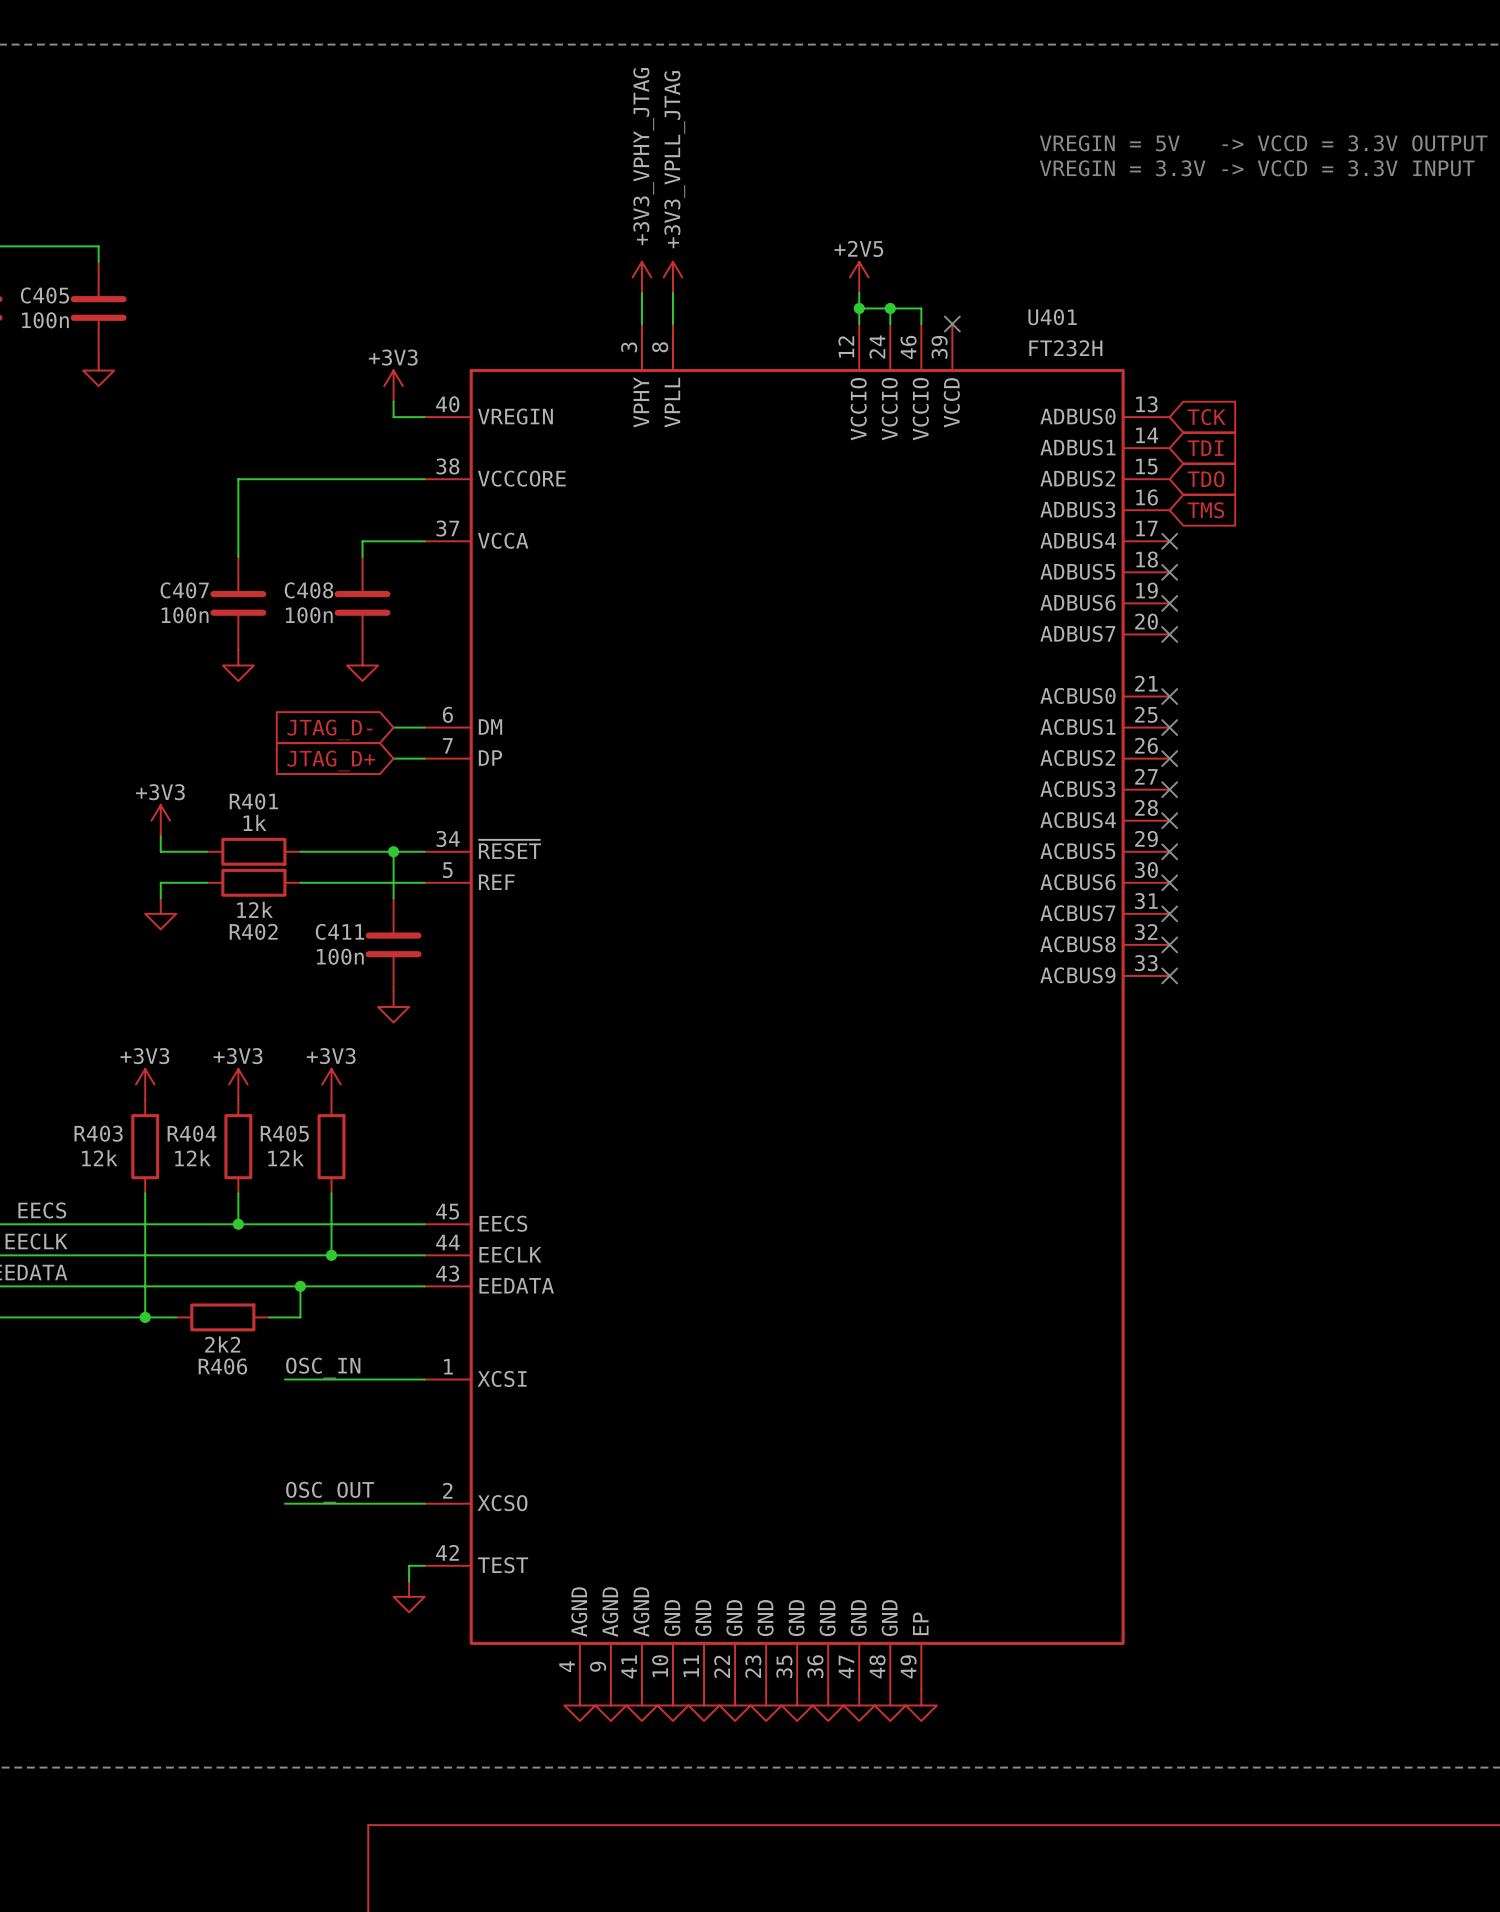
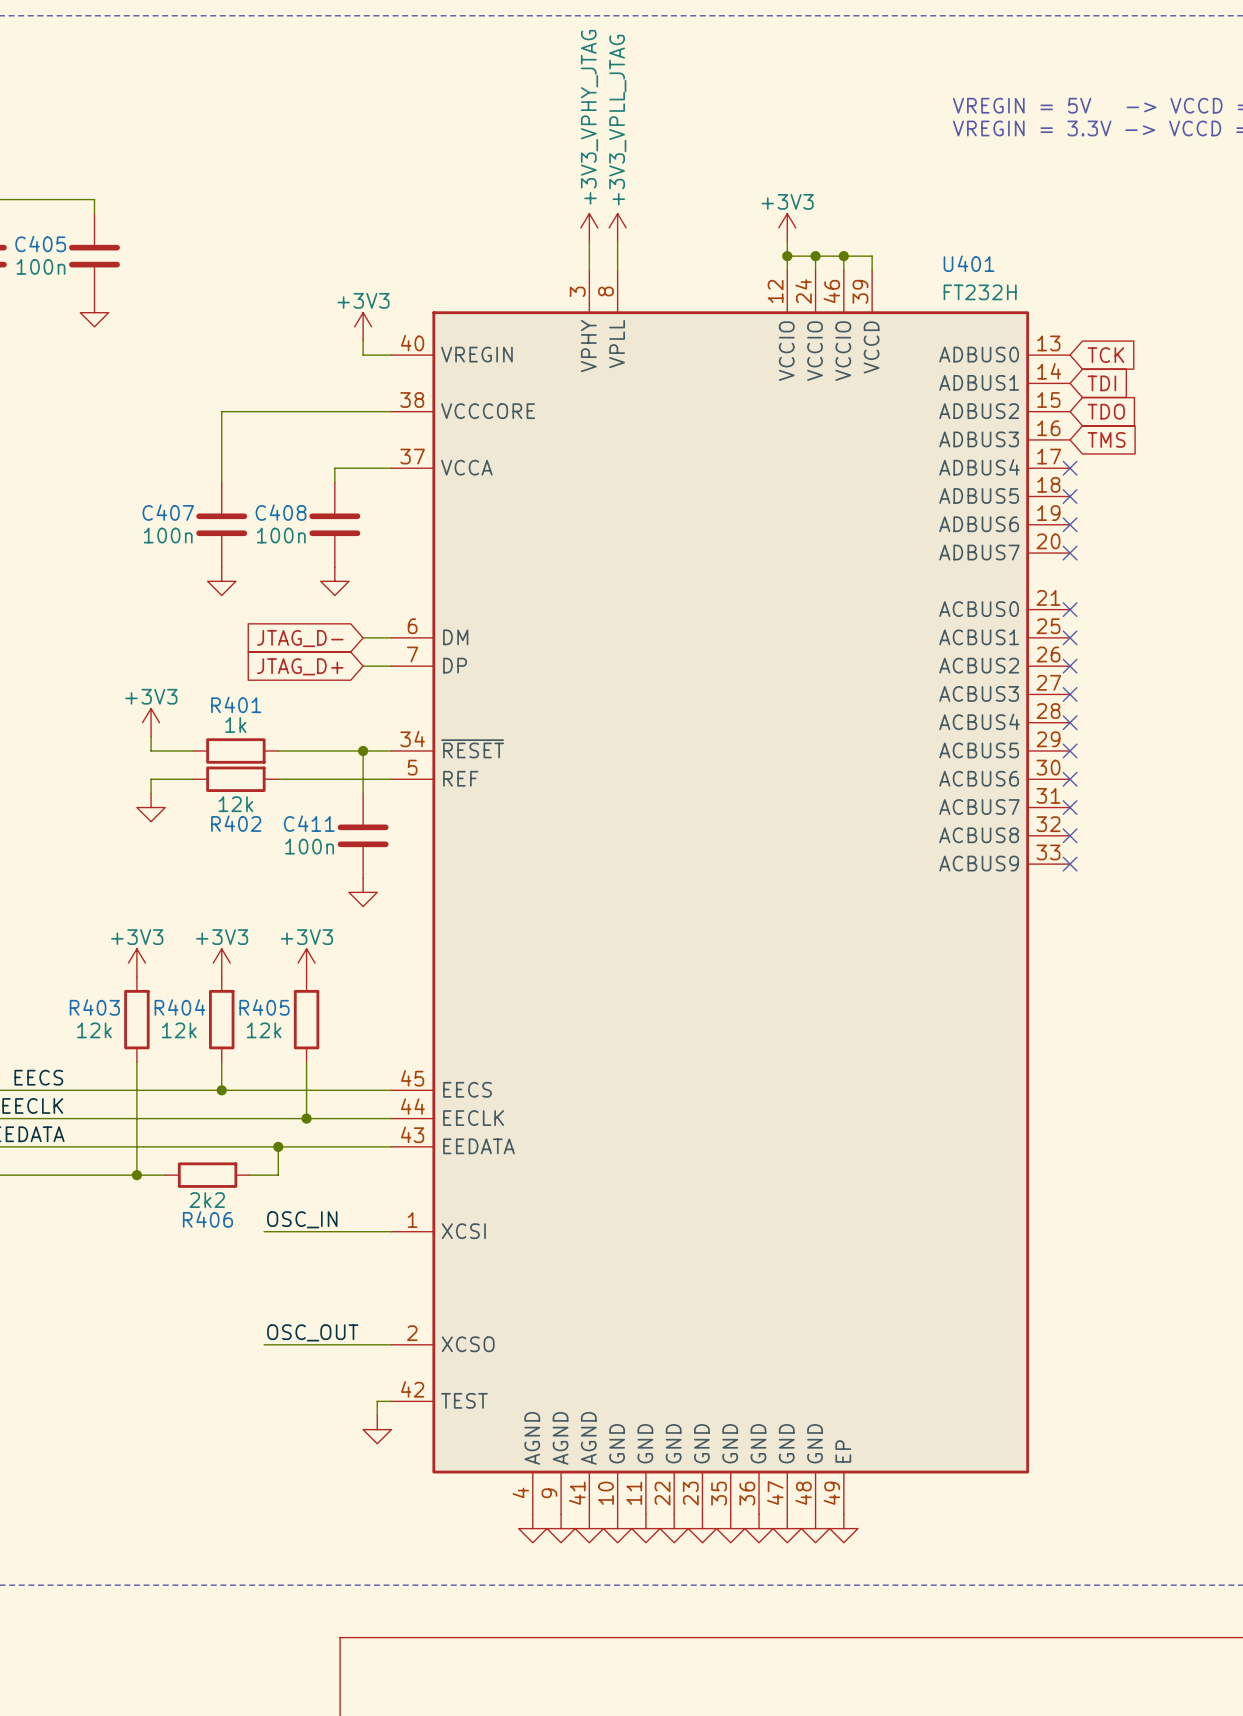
power symbol: +2V5 (859, 277) -> +3V3 (787, 227)
wire: none -> (843, 256) (872, 256) (872, 270)
junction: none -> (843, 256)
no-connect mark: (952, 323) -> none

